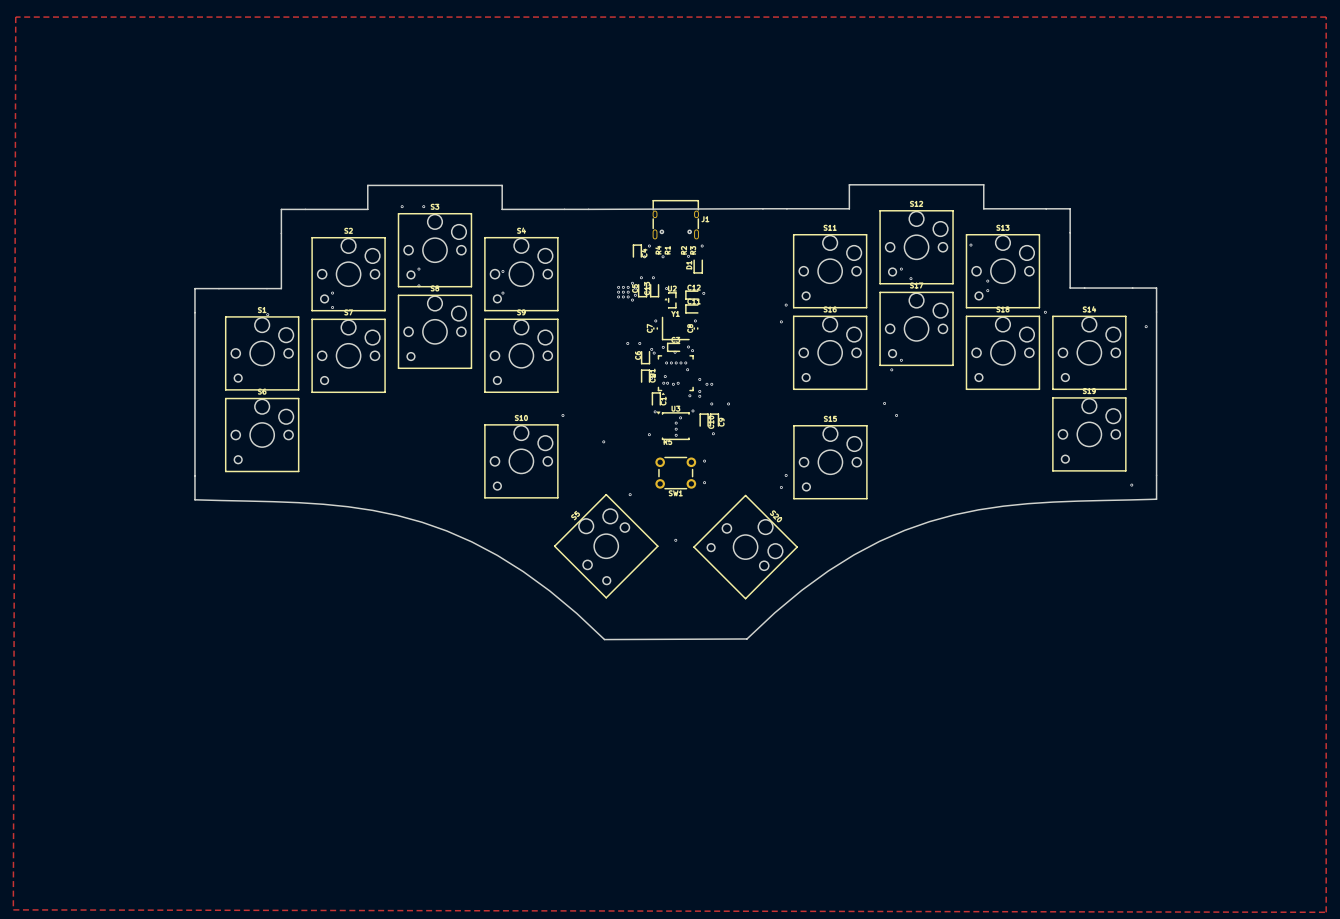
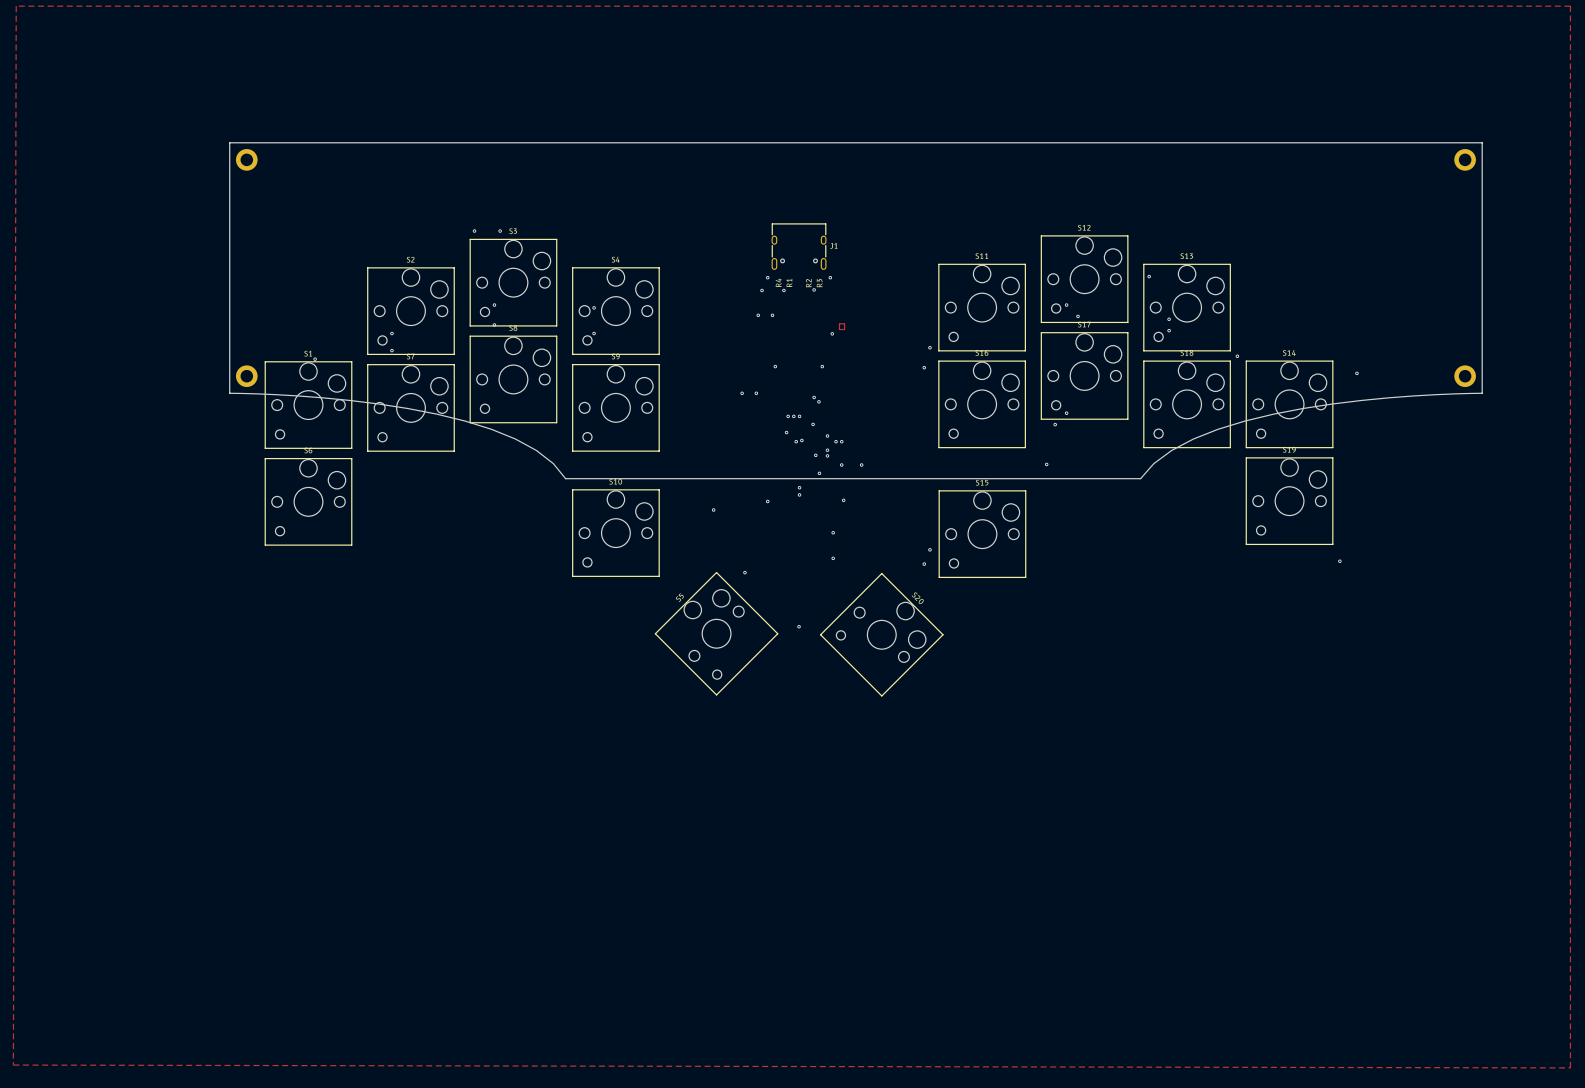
board edge: none -> (229, 142) (1482, 142) (1482, 393) (1361, 400) (1303, 408) (1245, 421) (1193, 439) (1171, 450) (1153, 463) (1140, 478) (565, 478) (553, 463) (536, 450) (515, 439) (465, 421) (407, 408) (349, 400) (229, 393) (229, 142)
part: none -> (246, 159)
part: none -> (1465, 159)
board edge: (849, 184) (849, 208) (502, 209) (502, 185) (367, 185) (367, 209) (281, 209) (281, 288) (194, 288) (194, 499) (323, 504) (372, 510) (422, 522) (471, 541) (523, 571) (576, 613) (604, 639) (746, 638) (801, 590) (854, 554) (904, 530) (954, 514) (1028, 503) (1156, 499) (1156, 288) (1070, 288) (1070, 208) (983, 208) (983, 184) (849, 184) -> none
part: (637, 251) -> none
part: (698, 266) -> none
via: (632, 283) -> none
track: none -> (839, 323) (839, 329) (844, 329) (844, 323) (839, 323)
via: (618, 287) -> none
via: (623, 287) -> none
via: (628, 287) -> none
via: (635, 288) -> none
via: (666, 288) -> none
part: (642, 290) -> none
part: (654, 290) -> none
via: (618, 292) -> none
via: (623, 292) -> none
via: (628, 292) -> none
via: (635, 295) -> none
part: (691, 295) -> none
via: (618, 296) -> none
via: (623, 296) -> none
via: (628, 296) -> none
via: (632, 300) -> none
part: (670, 300) -> none
part: (691, 308) -> none
part: (655, 328) -> none
part: (675, 328) -> none
part: (695, 328) -> none
part: none -> (246, 376)
part: none -> (1465, 376)
via: (663, 347) -> none
part: (673, 347) -> none
via: (651, 349) -> none
via: (675, 352) -> none
via: (654, 353) -> none
part: (645, 357) -> none
via: (680, 362) -> none
via: (685, 362) -> none
part: (675, 375) -> none
part: (645, 376) -> none
via: (651, 378) -> none
via: (663, 383) -> none
via: (667, 383) -> none
part: (656, 398) -> none
via: (655, 411) -> none
via: (562, 415) -> none
via: (896, 415) -> none
via: (680, 417) -> none
part: (704, 420) -> none
part: (714, 420) -> none
part: (672, 425) -> none
via: (676, 435) -> none
part: (667, 441) -> none
part: (675, 473) -> none

